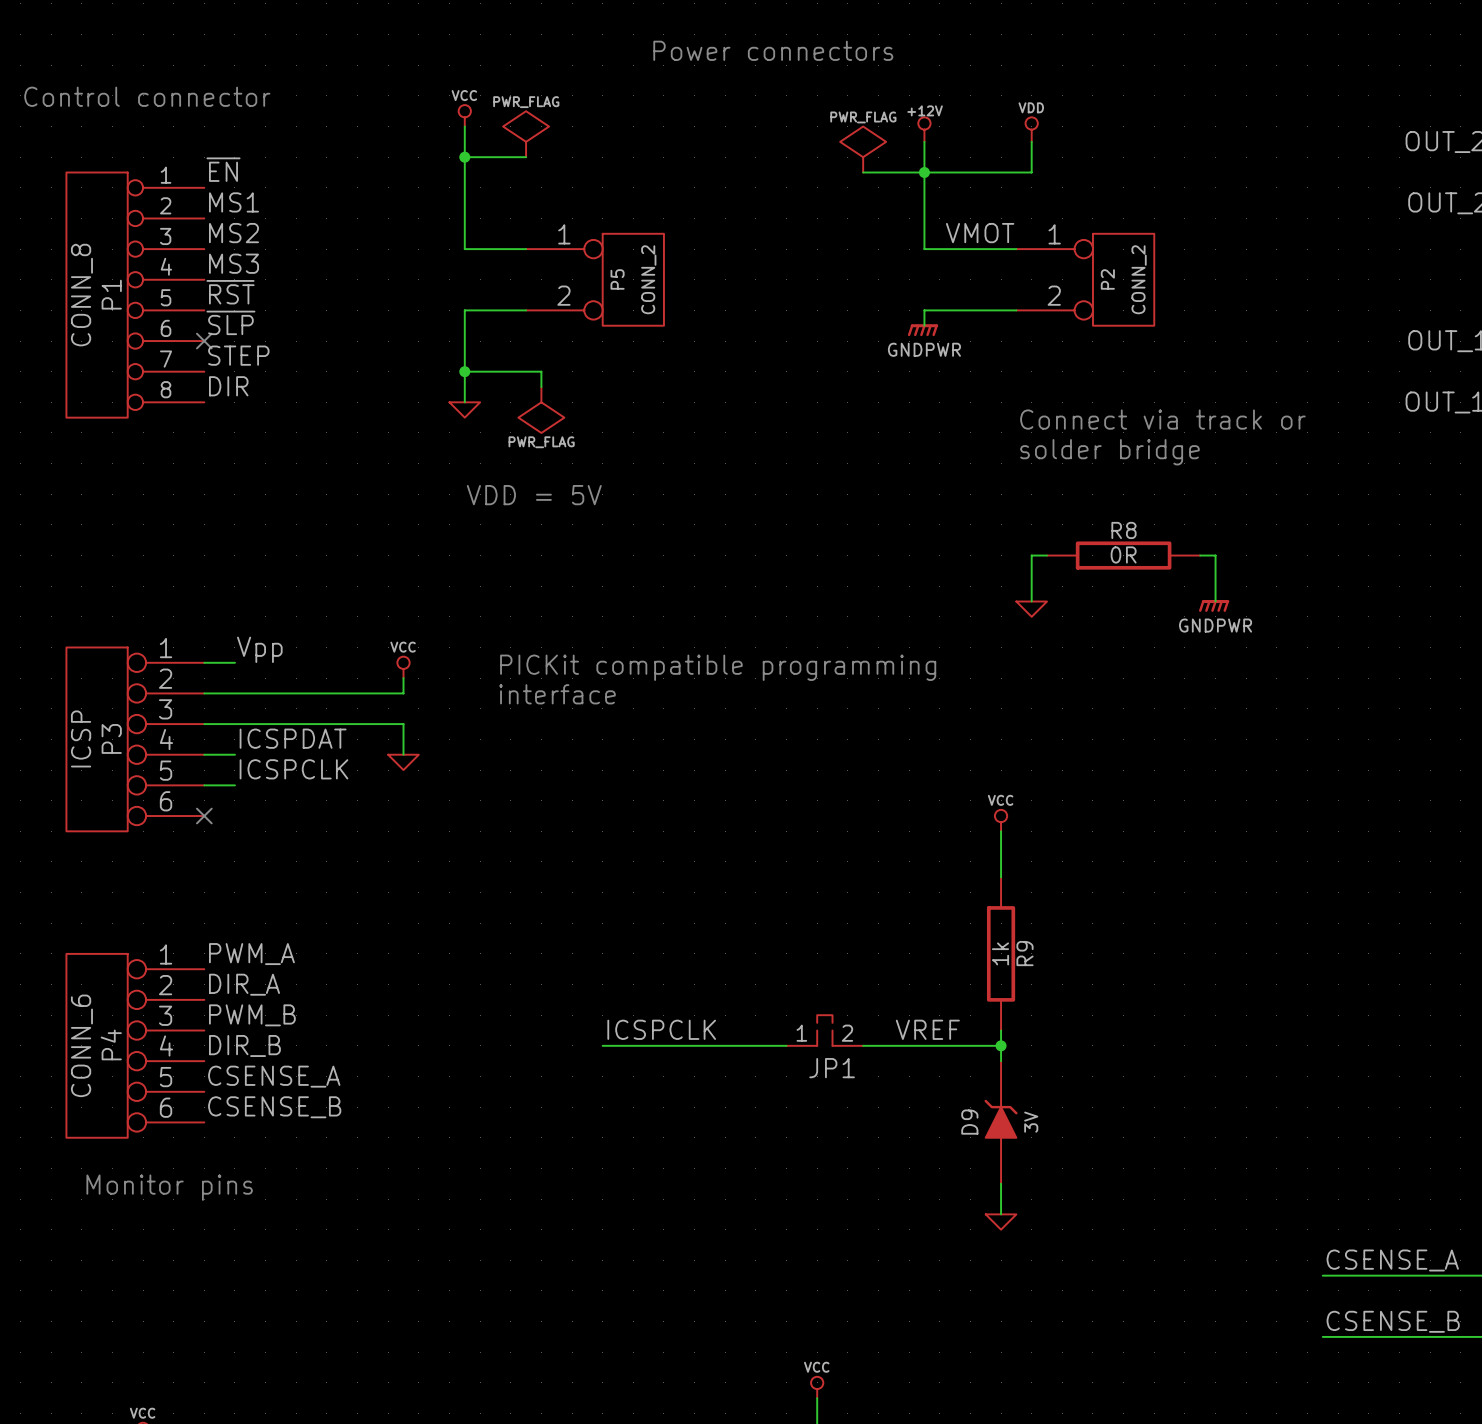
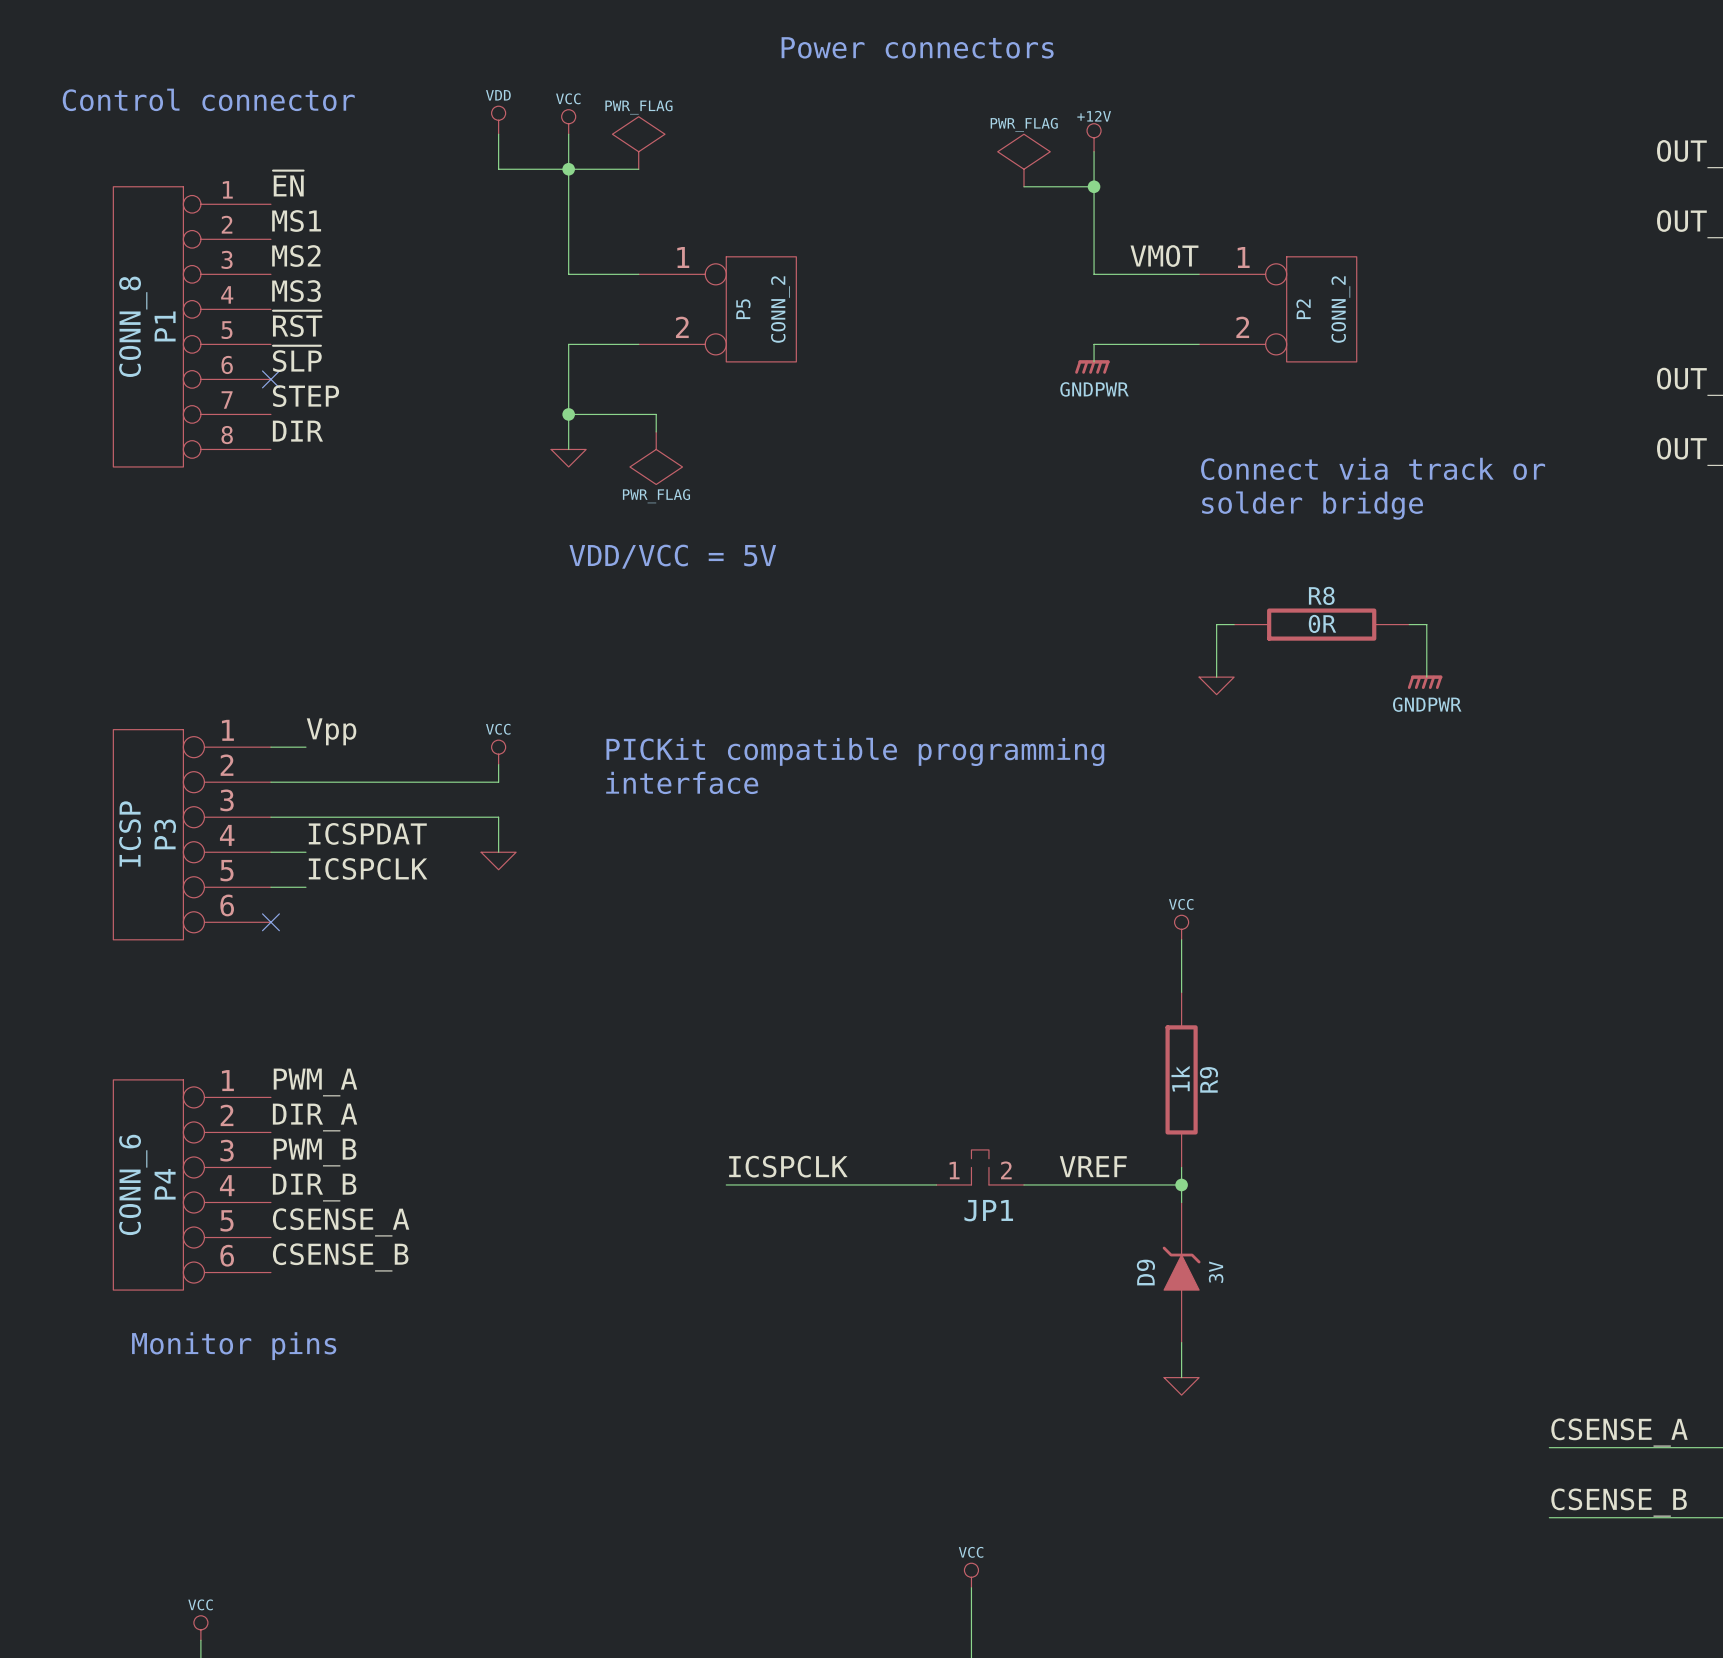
power symbol: none -> VDD (498, 120)
wire: none -> (498, 134) (498, 169) (568, 169)
power symbol: VDD (1031, 129) -> none
wire: (1031, 141) (1031, 172) (924, 172) -> none
text: VDD = 5V (534, 495) -> VDD/VCC = 5V (672, 556)

